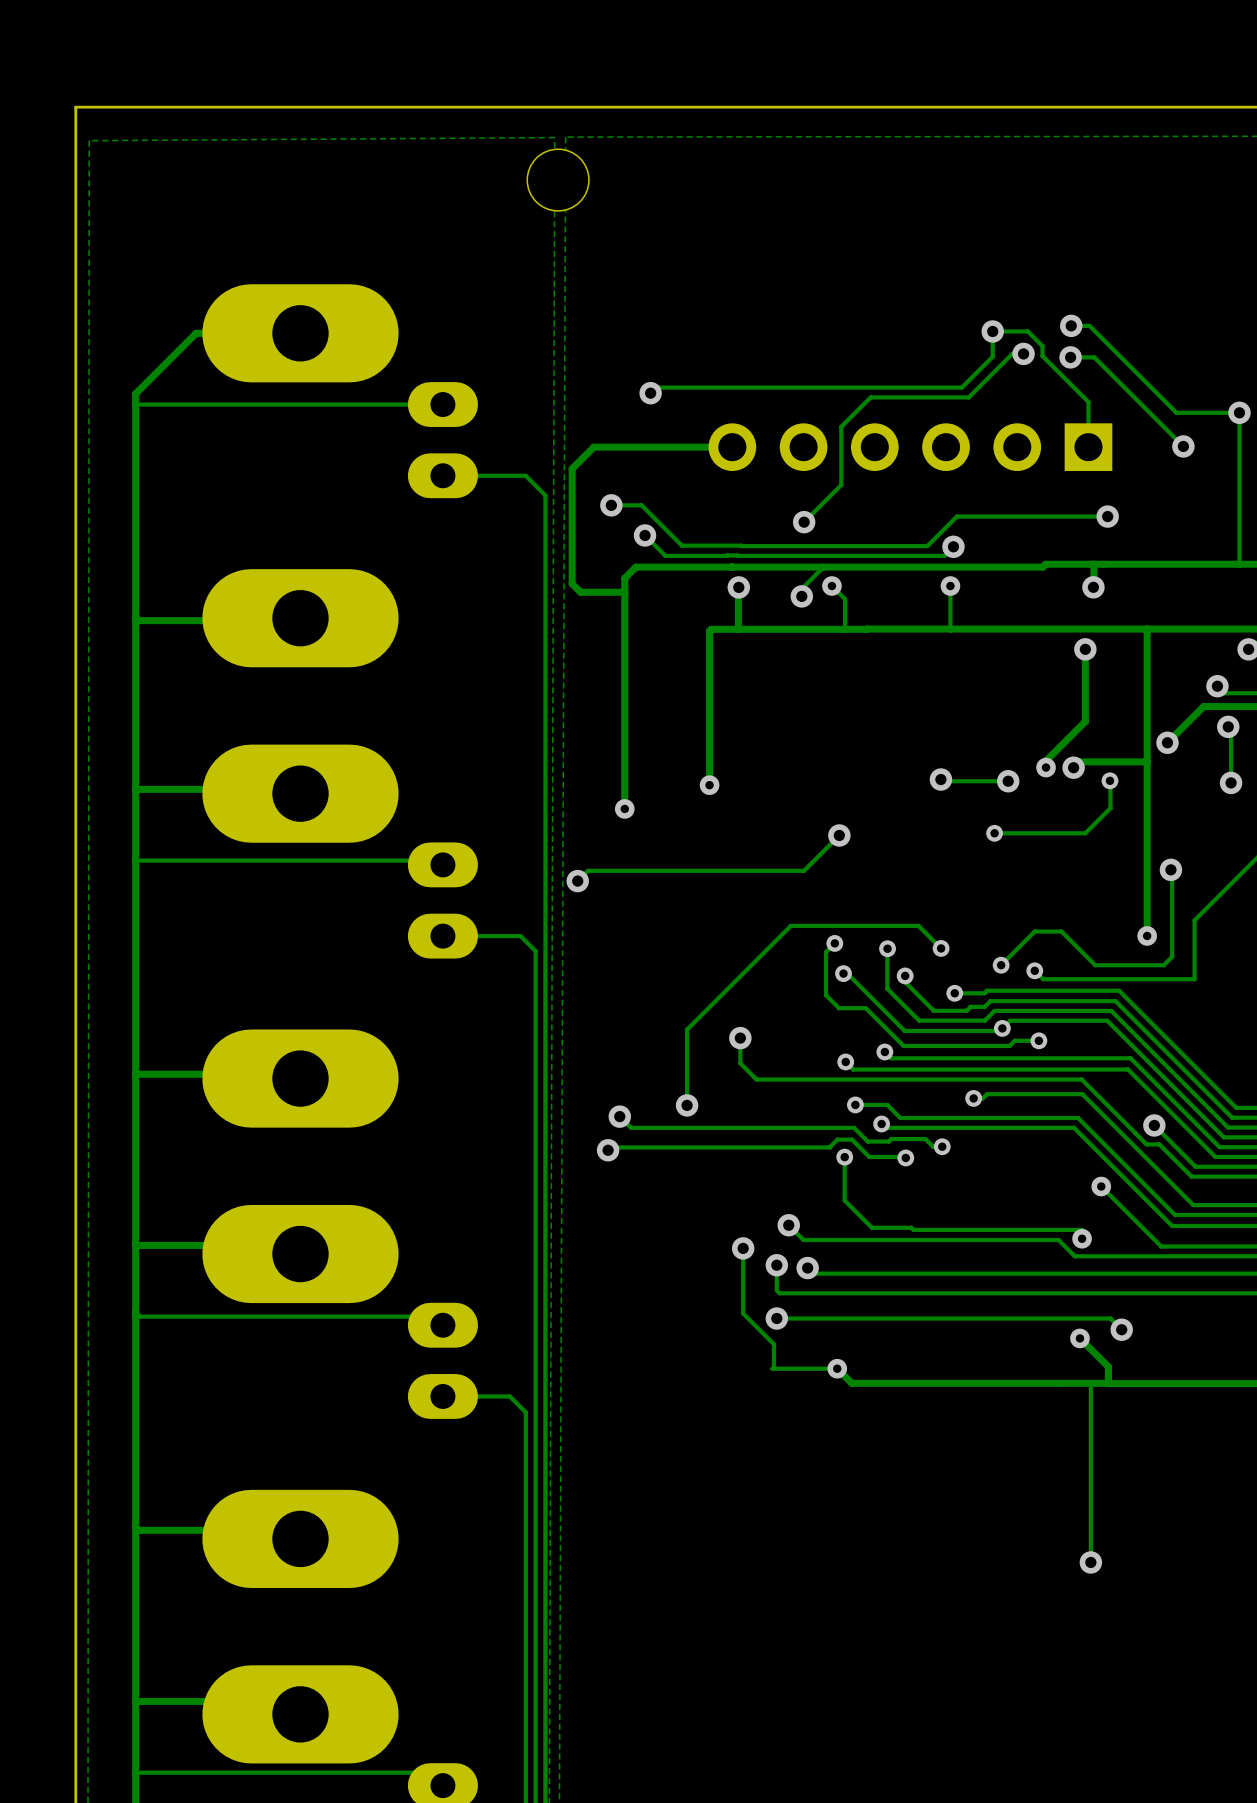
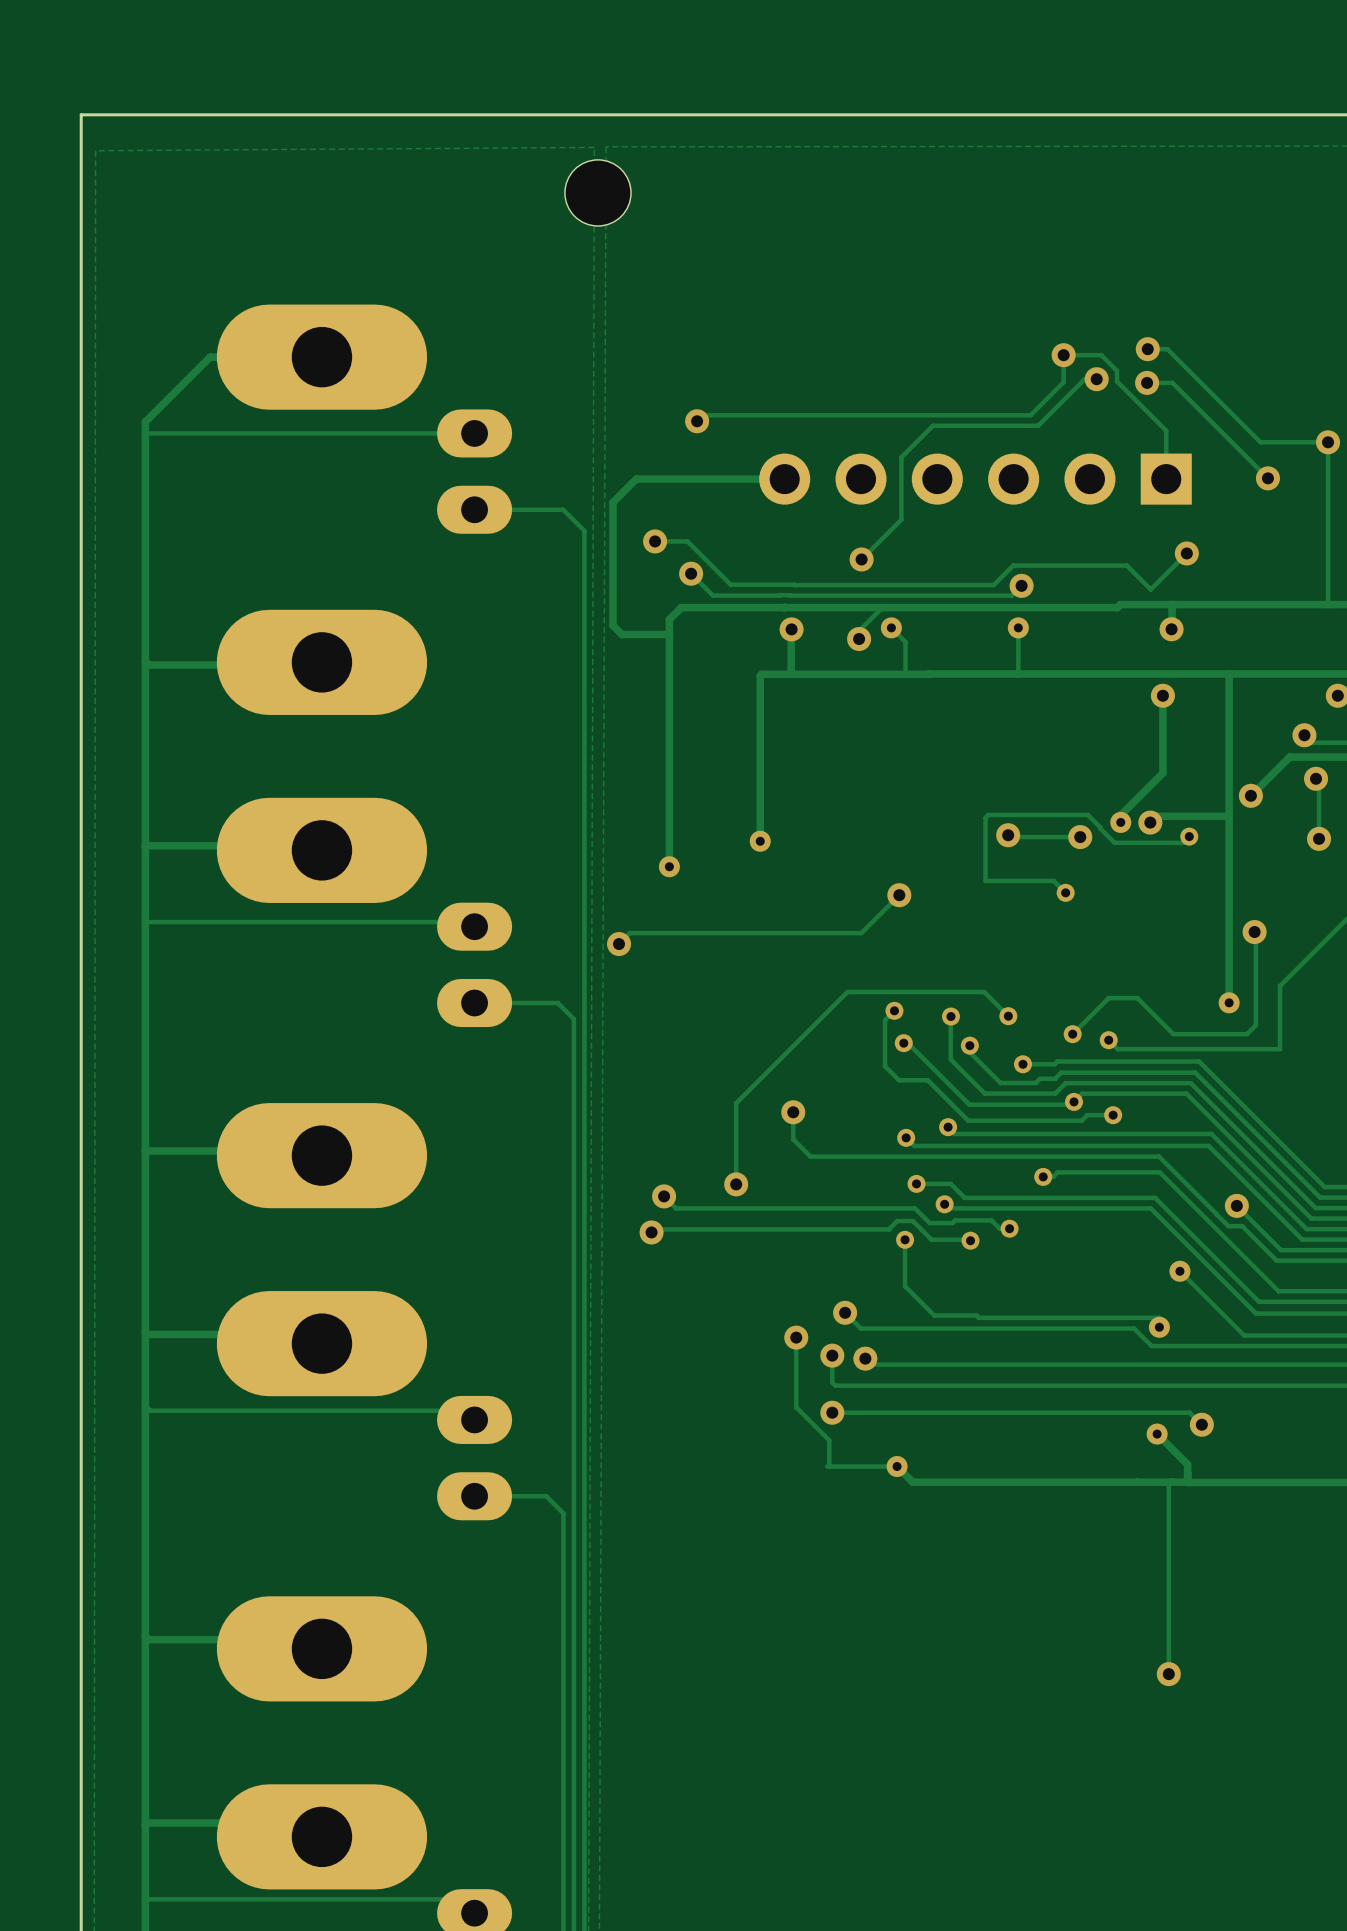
track: (1107, 516) (956, 516) (945, 527) -> (1186, 553) (1150, 589) (1126, 565) (1013, 565)
track: (1109, 780) (1110, 808) (1085, 833) (994, 833) -> (1189, 836) (1183, 842) (1114, 842) (1087, 814) (988, 814) (985, 817) (985, 880) (1053, 880) (1065, 892)

